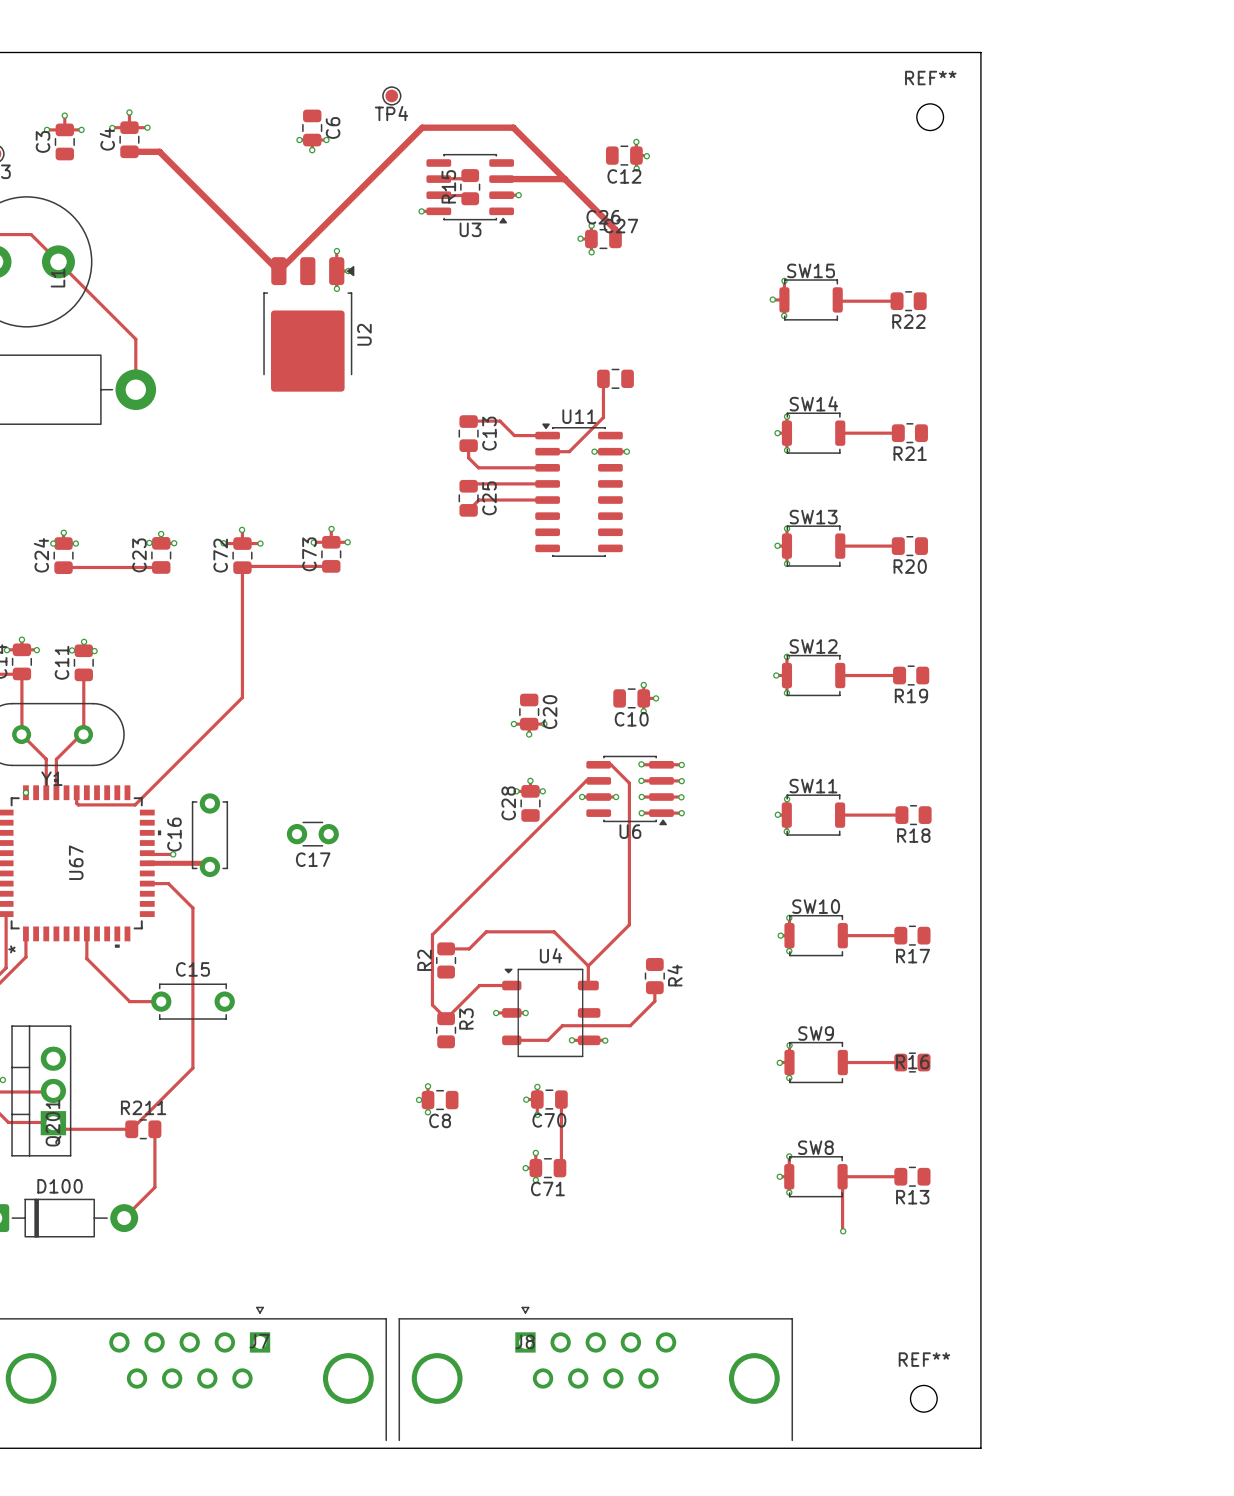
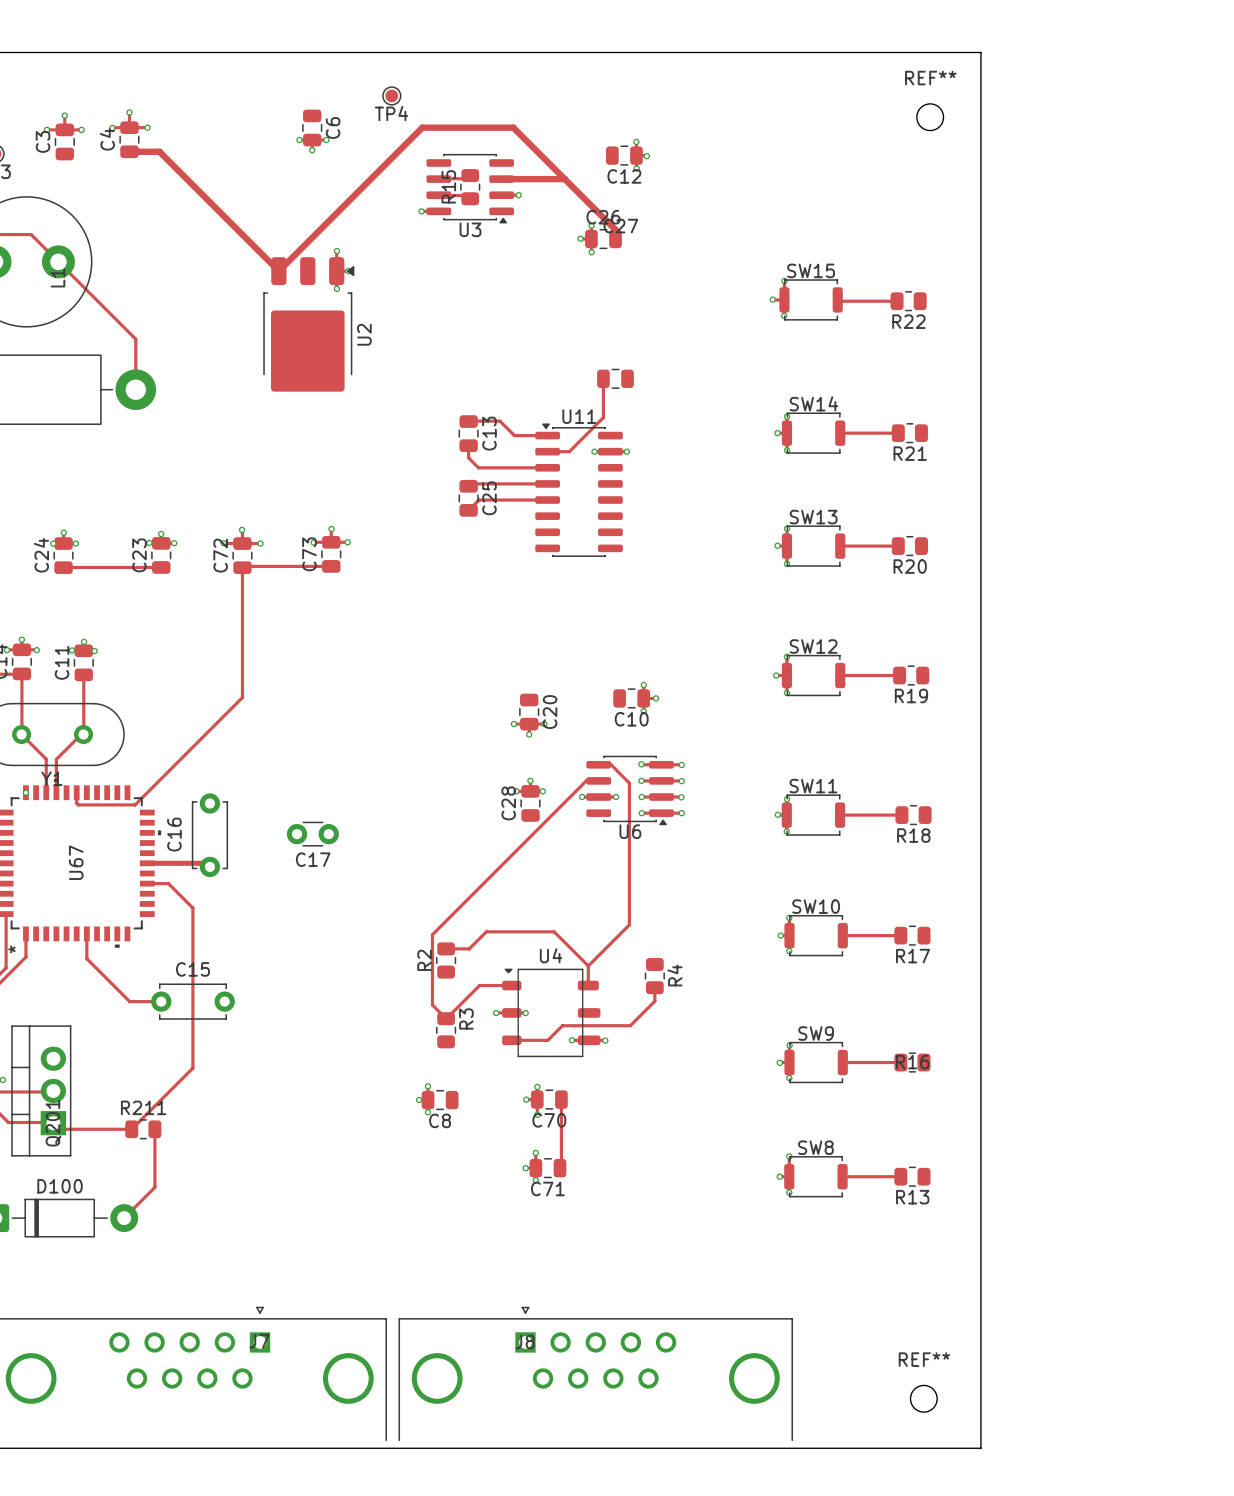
track: (147, 853) (173, 854) -> none
via: (173, 854) -> none
track: (842, 1176) (843, 1231) -> none
via: (843, 1231) -> none

